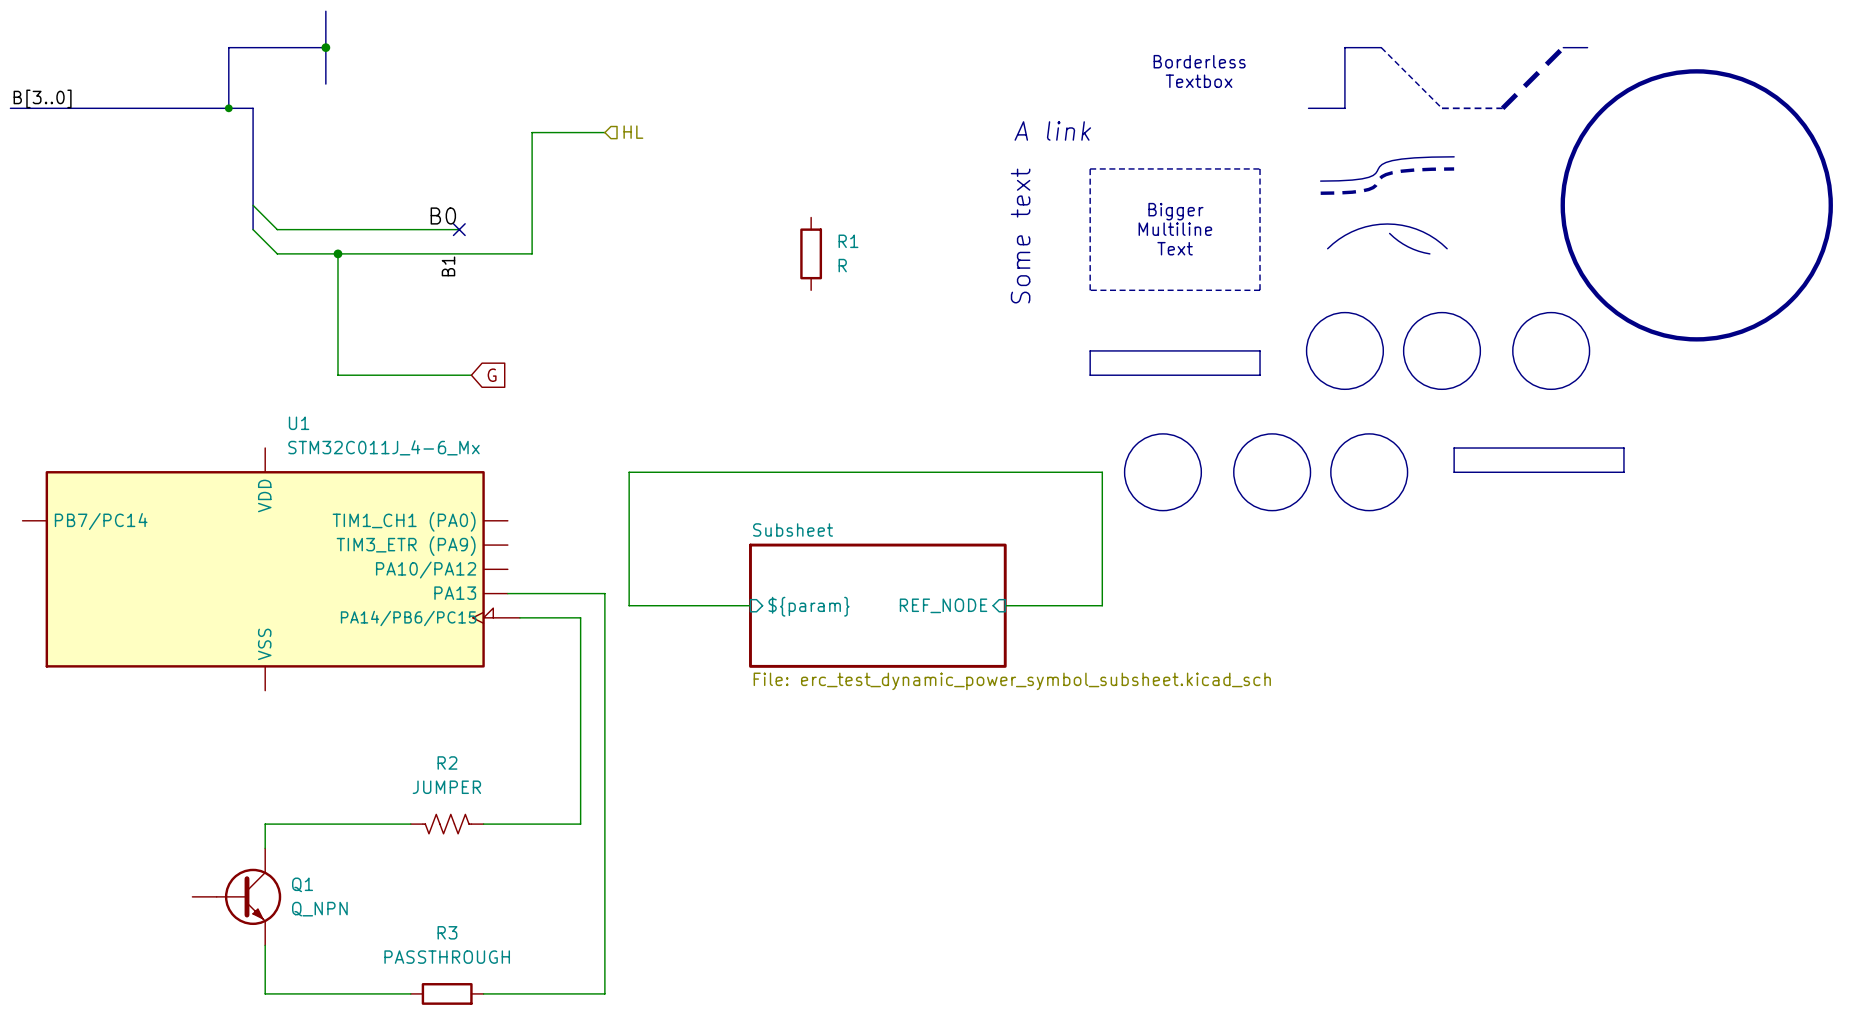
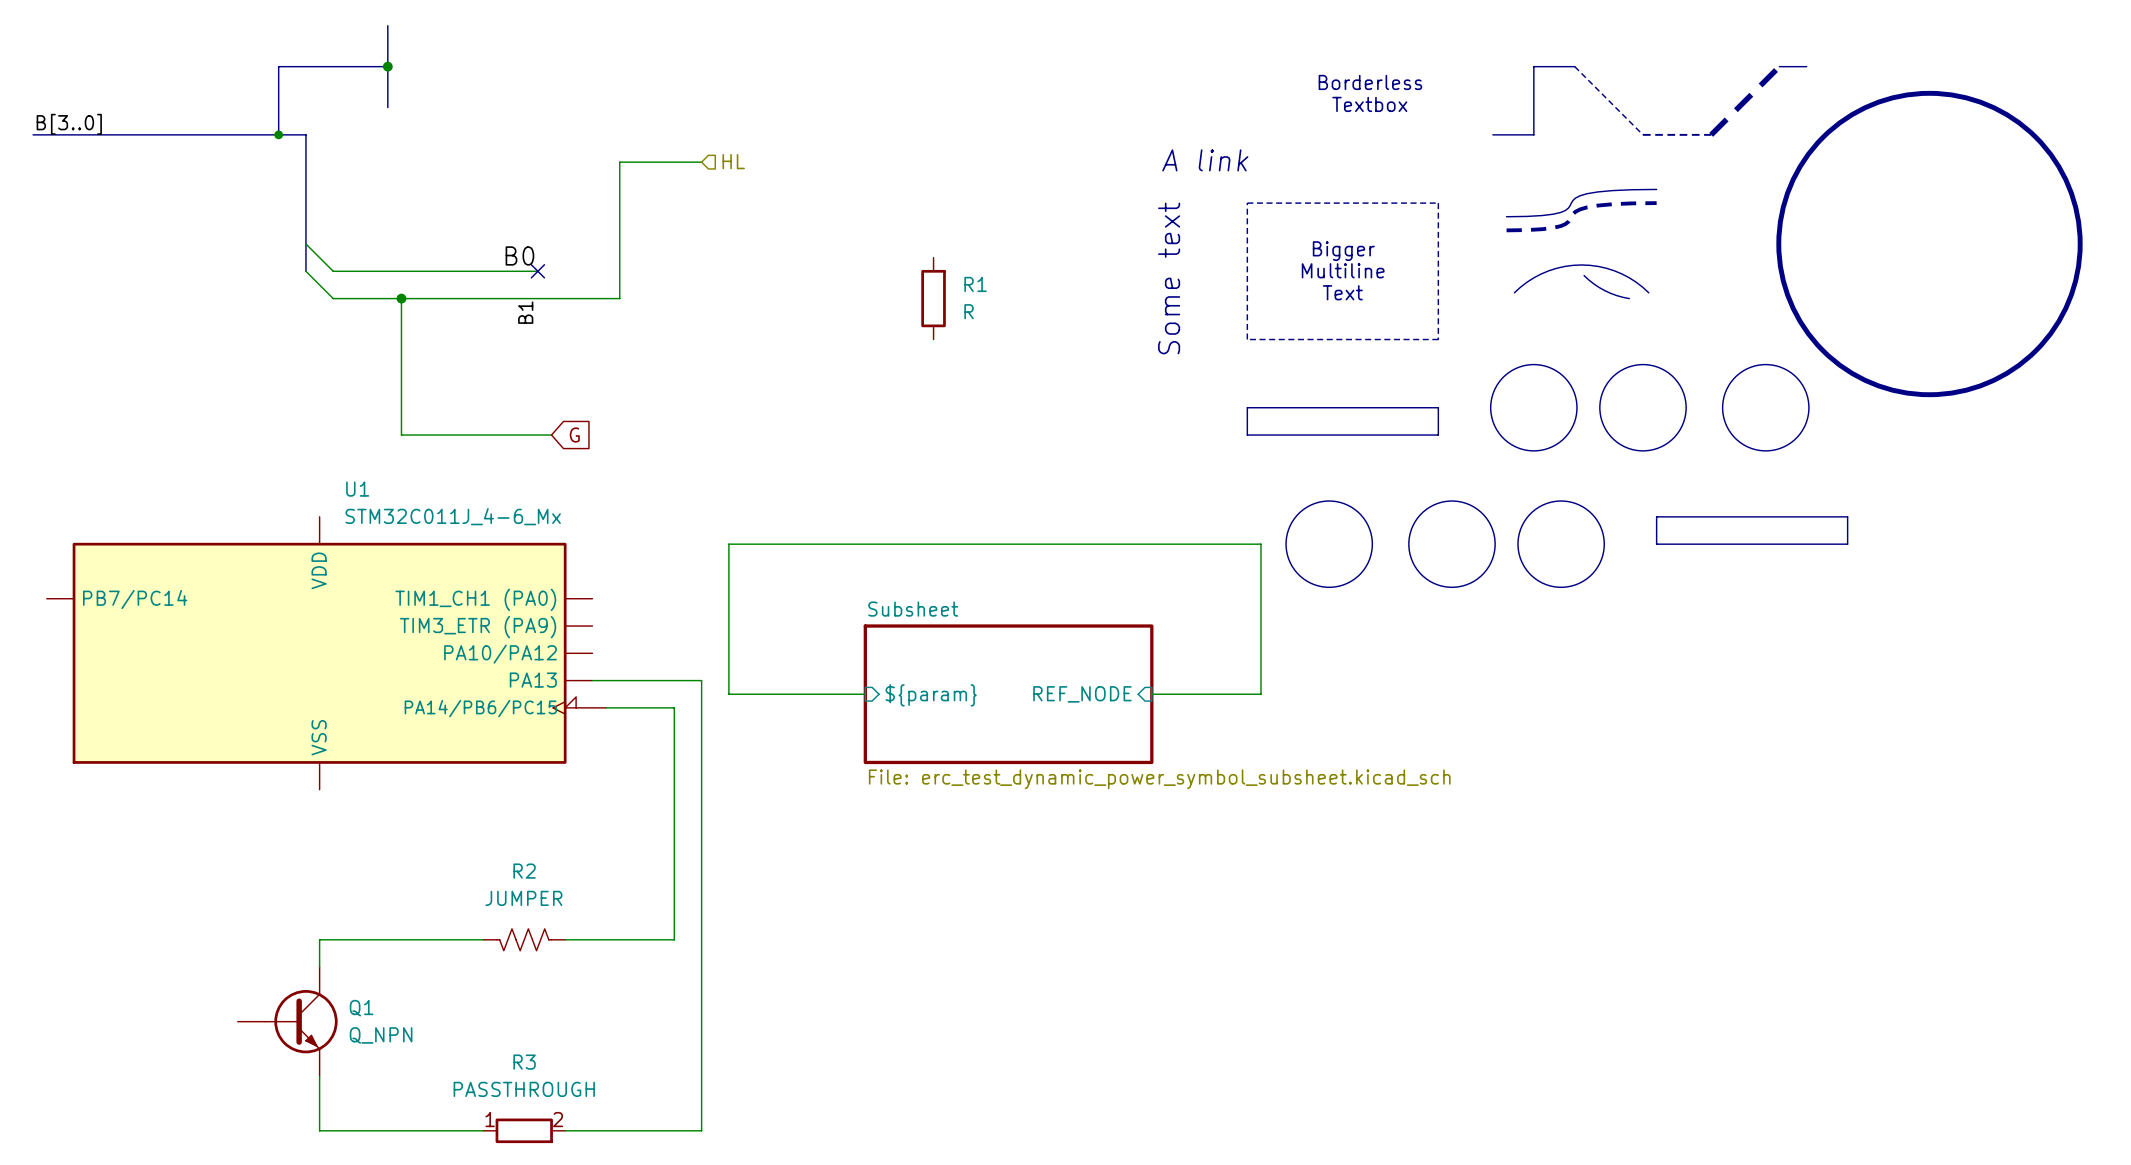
R3 pin number: none -> 1 (490, 1119)
R3 pin number: none -> 2 (558, 1119)

